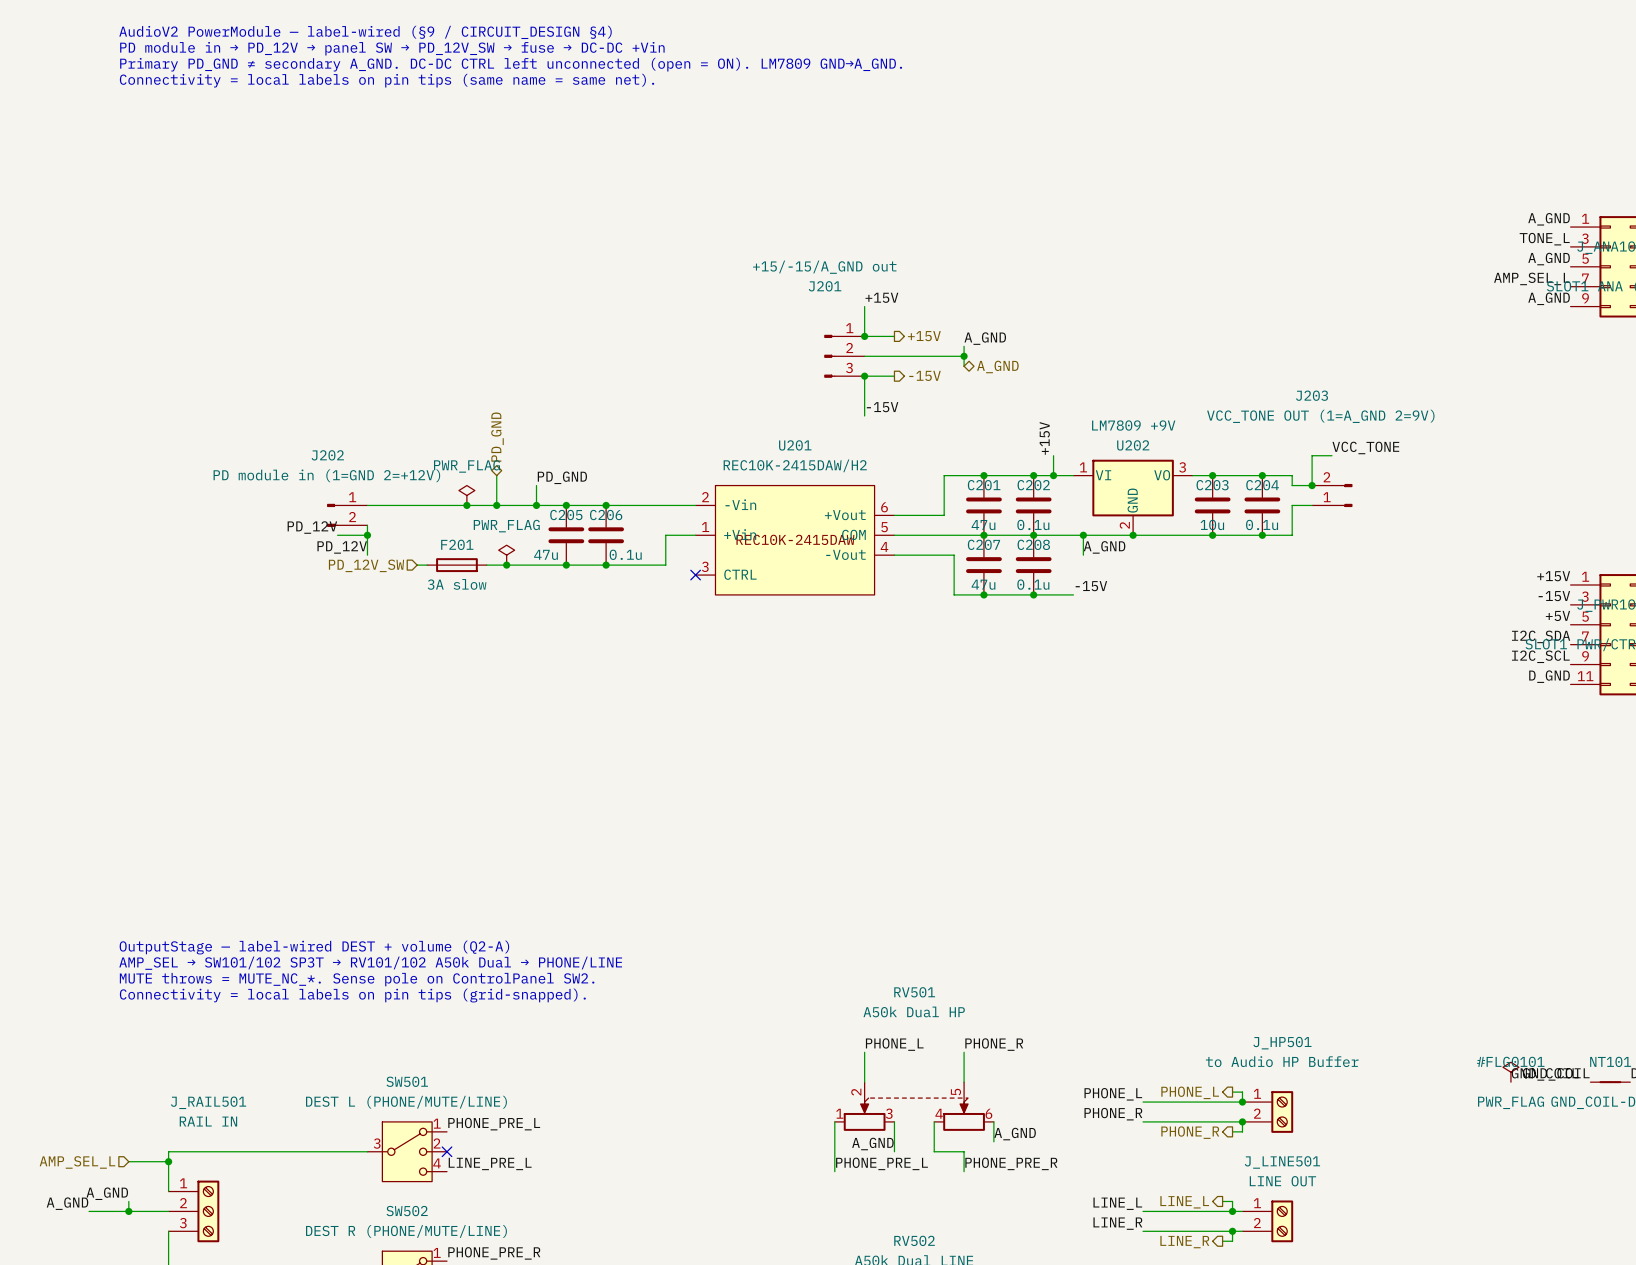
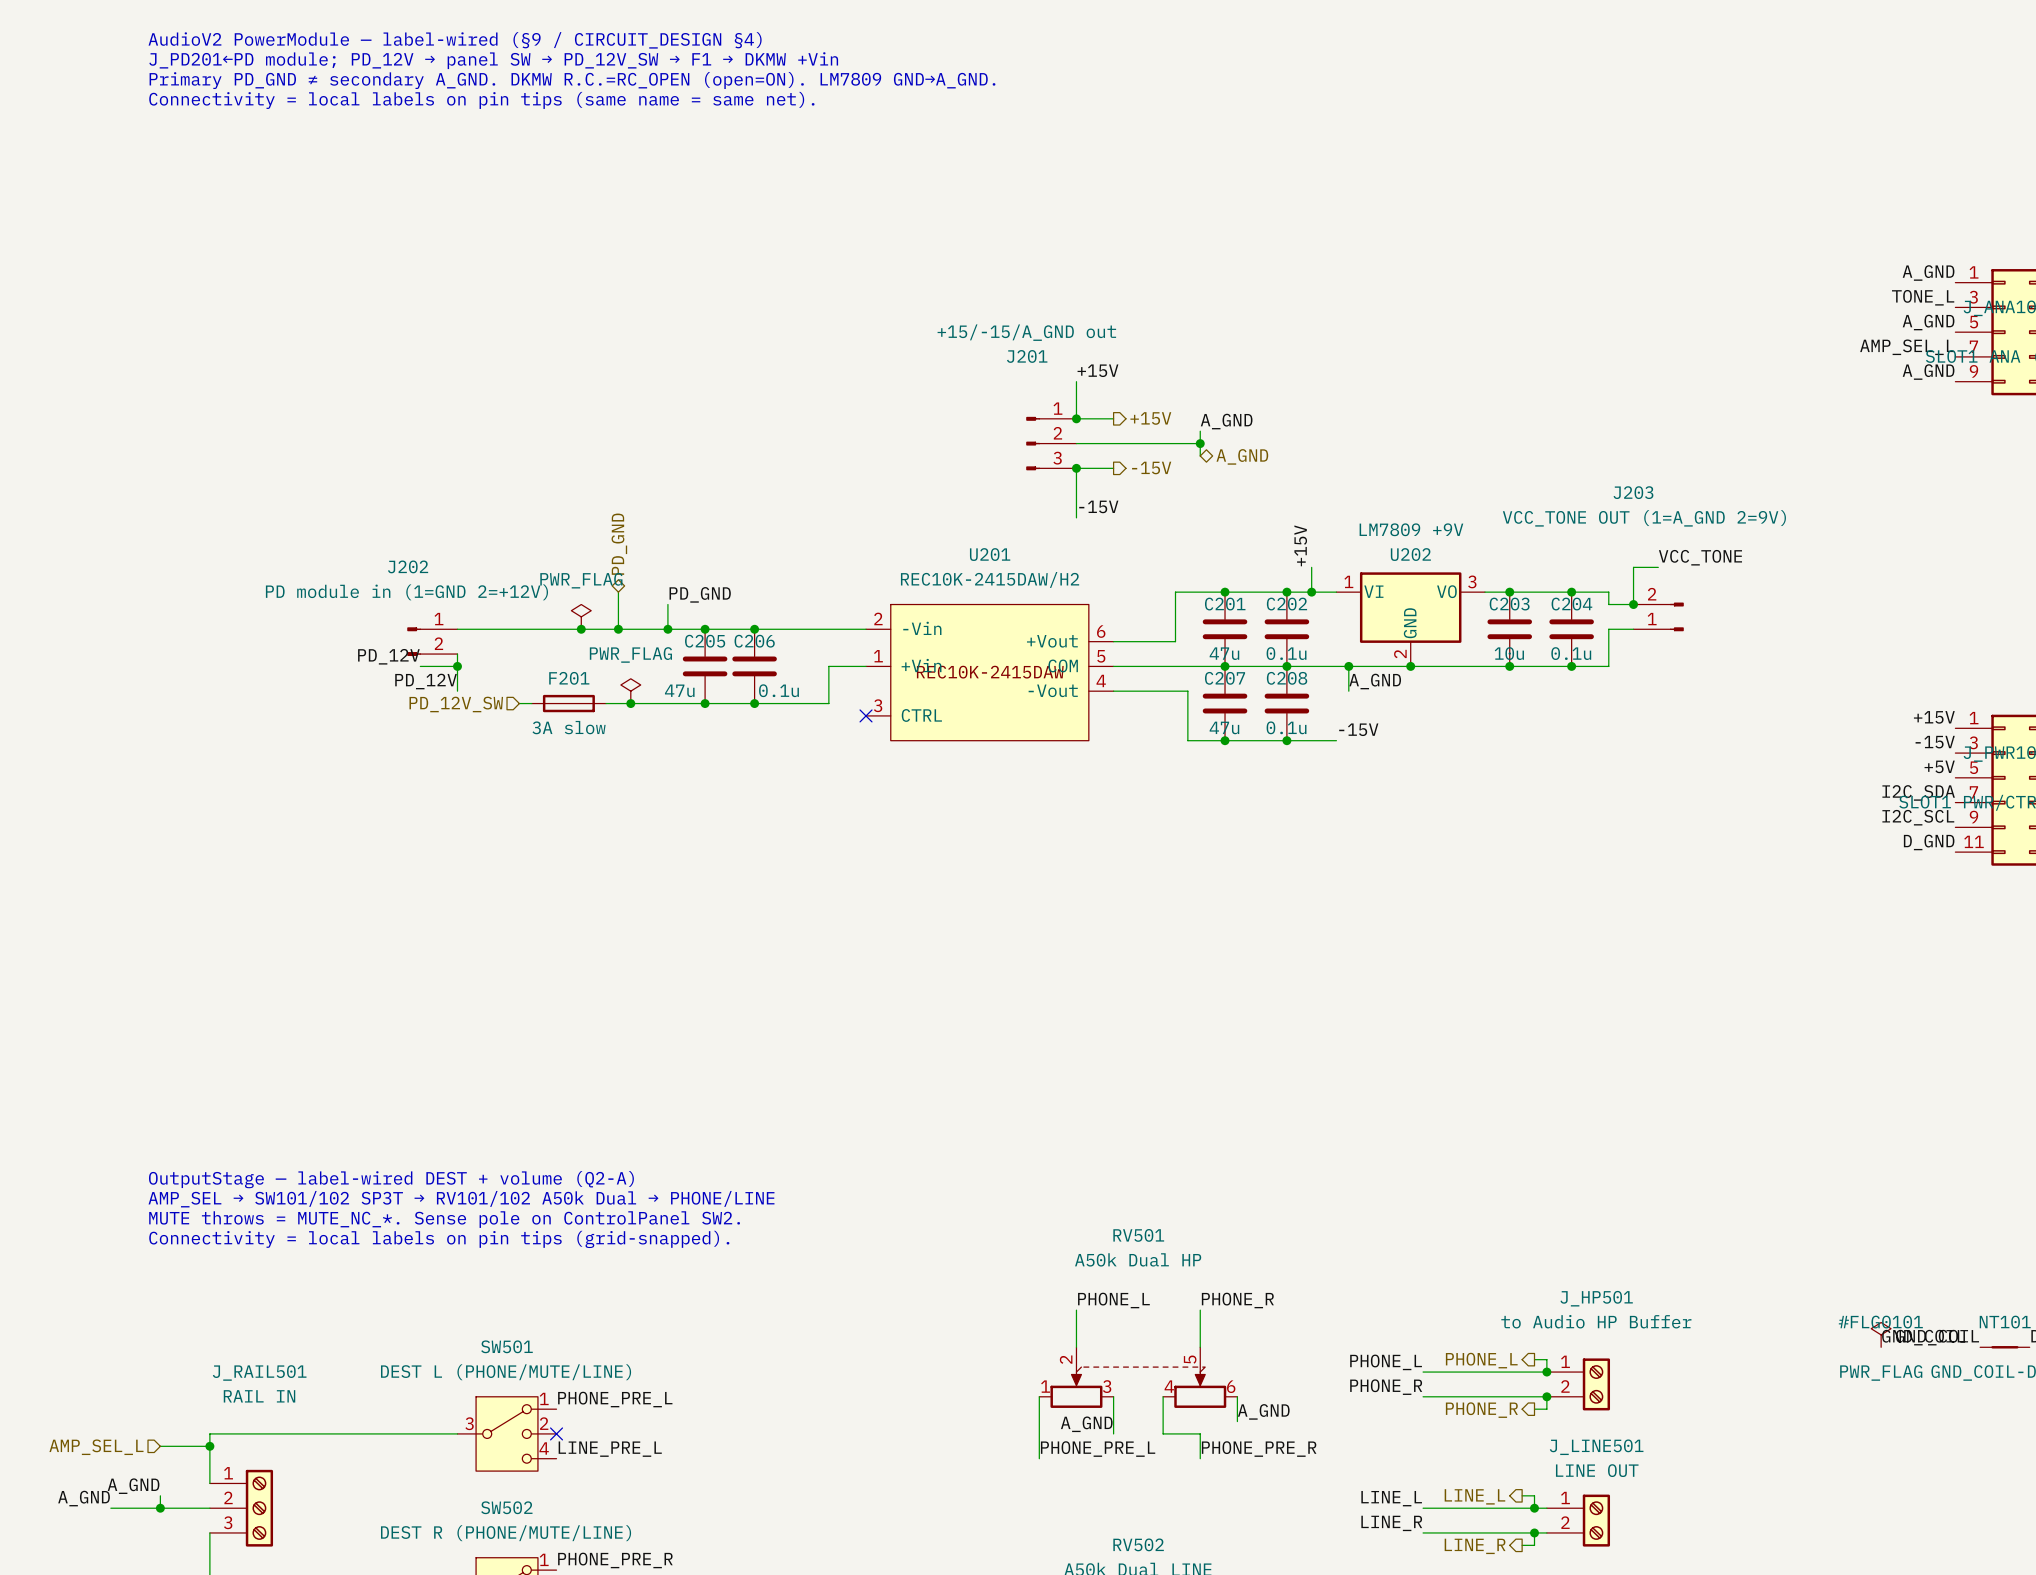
text: PD module in → PD_12V → panel SW → PD_12V_SW → fuse → DC-DC +Vin (392, 48) -> J_PD201←PD module; PD_12V → panel SW → PD_12V_SW → F1 → DKMW +Vin (493, 60)
text: Primary PD_GND ≠ secondary A_GND. DC-DC CTRL left unconnected (open = ON). LM7809 GND→A_GND. (511, 64) -> Primary PD_GND ≠ secondary A_GND. DKMW R.C.=RC_OPEN (open=ON). LM7809 GND→A_GND. (572, 80)

